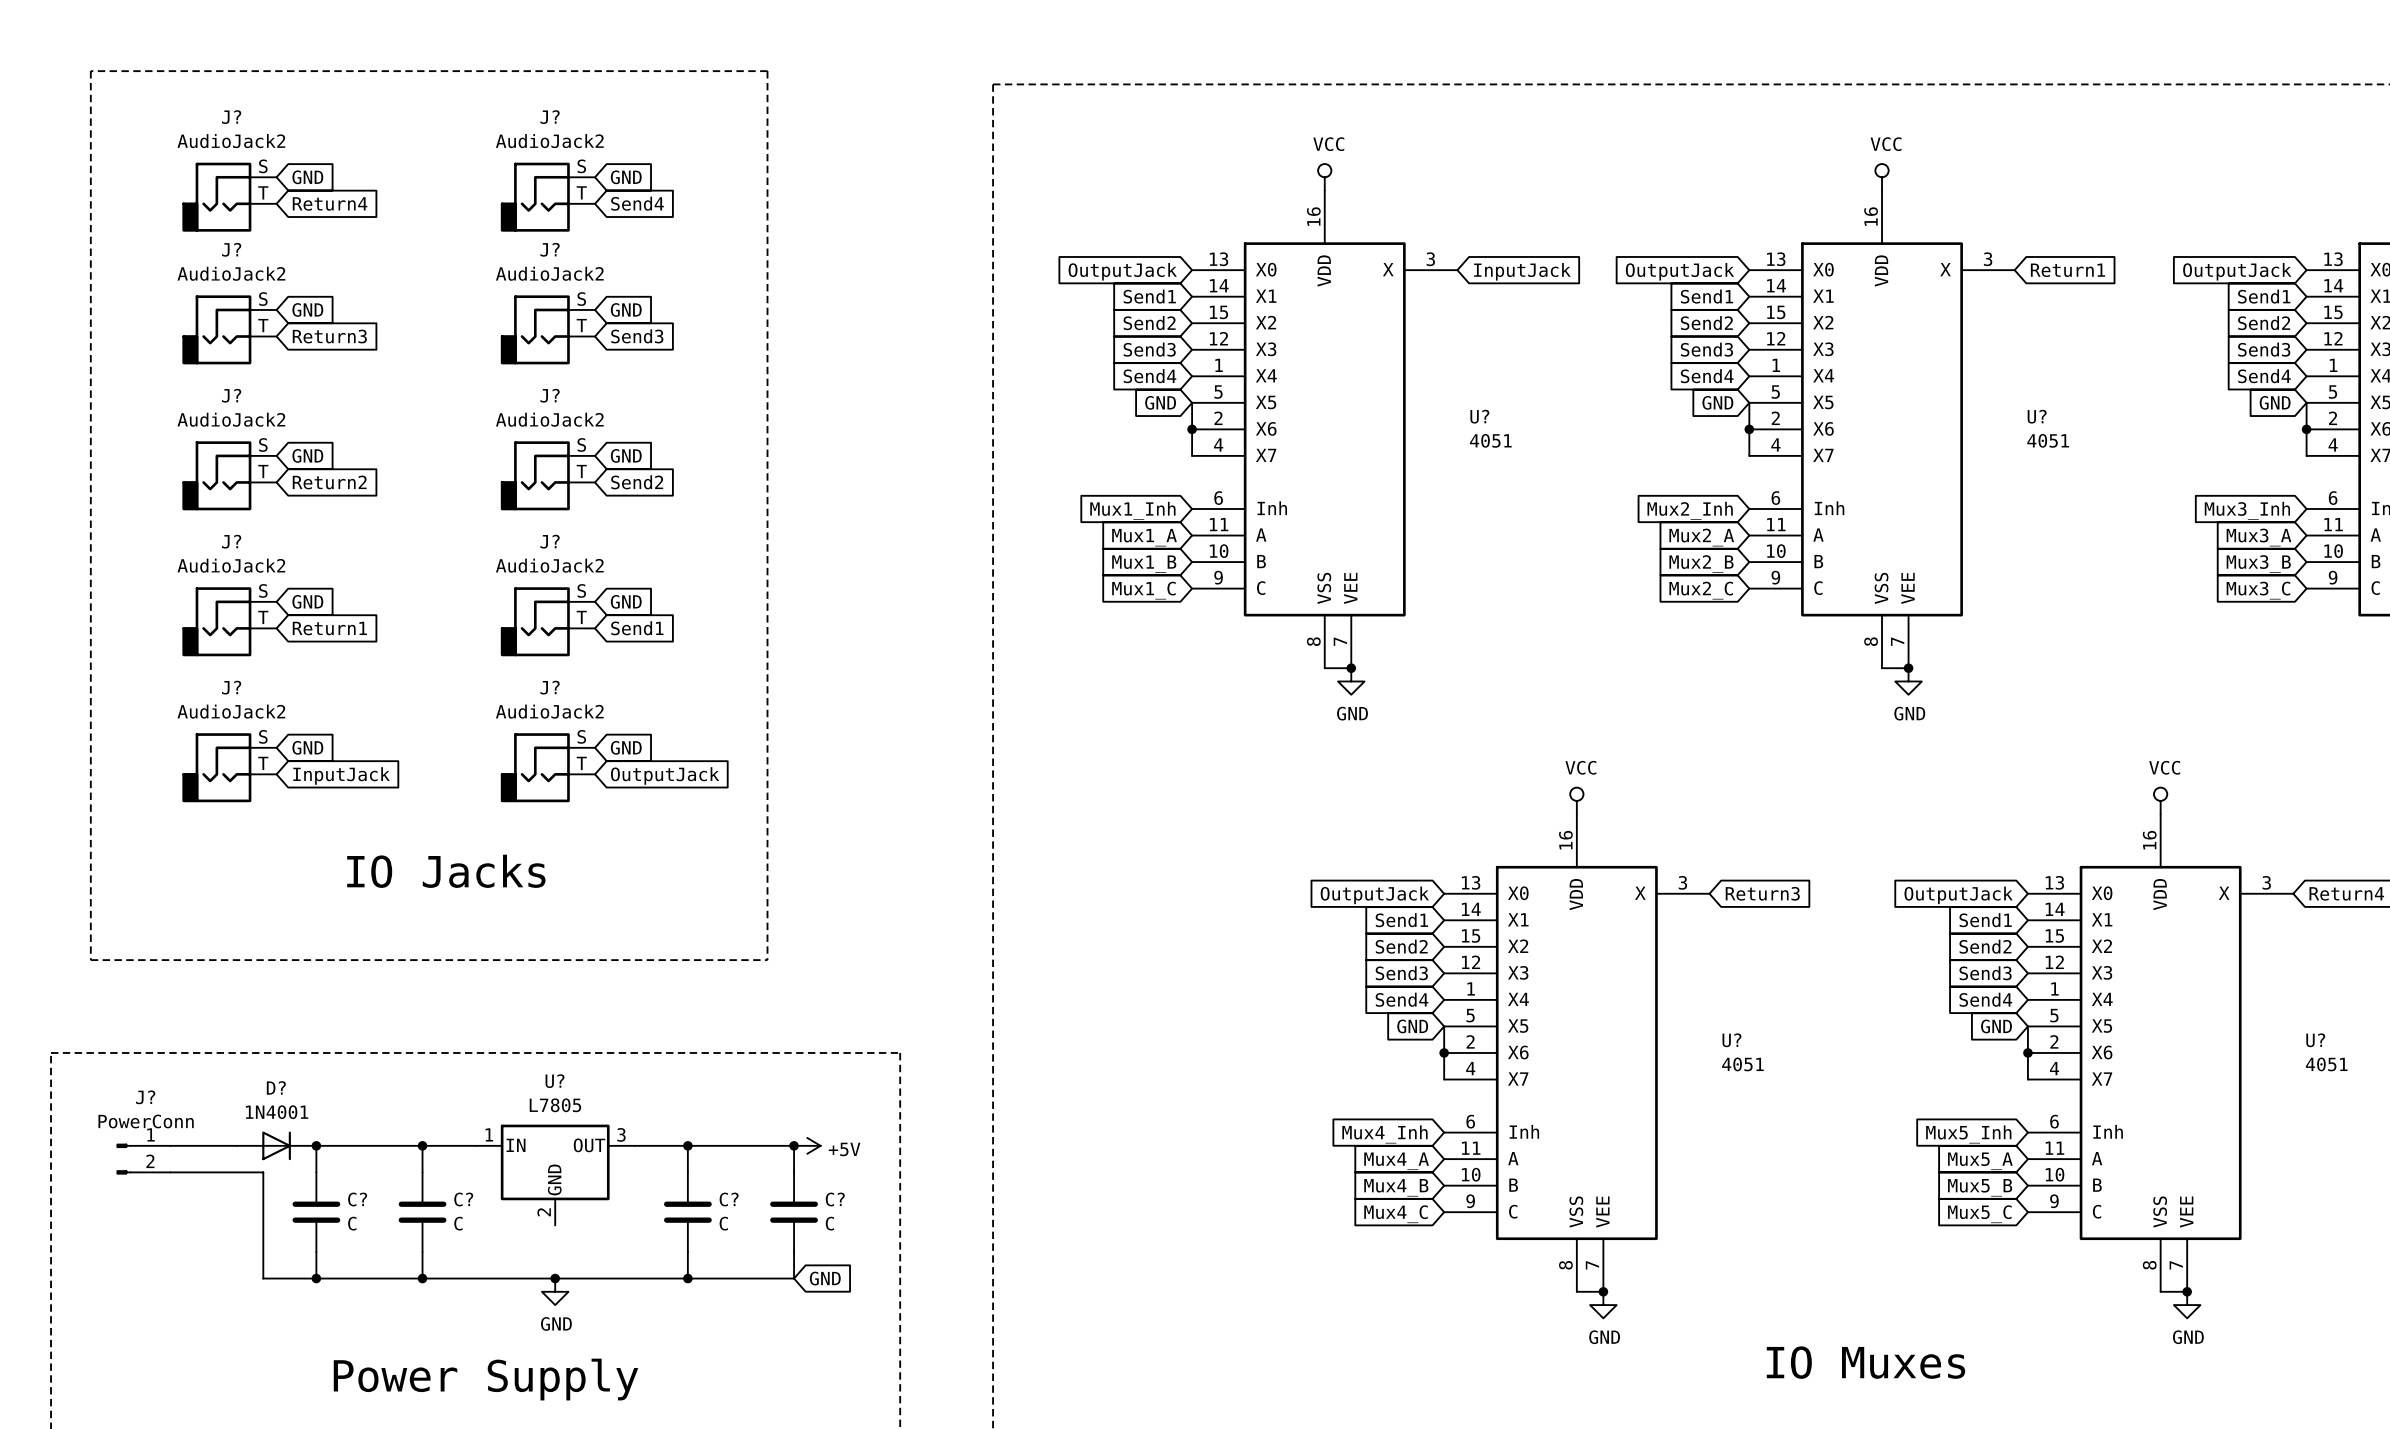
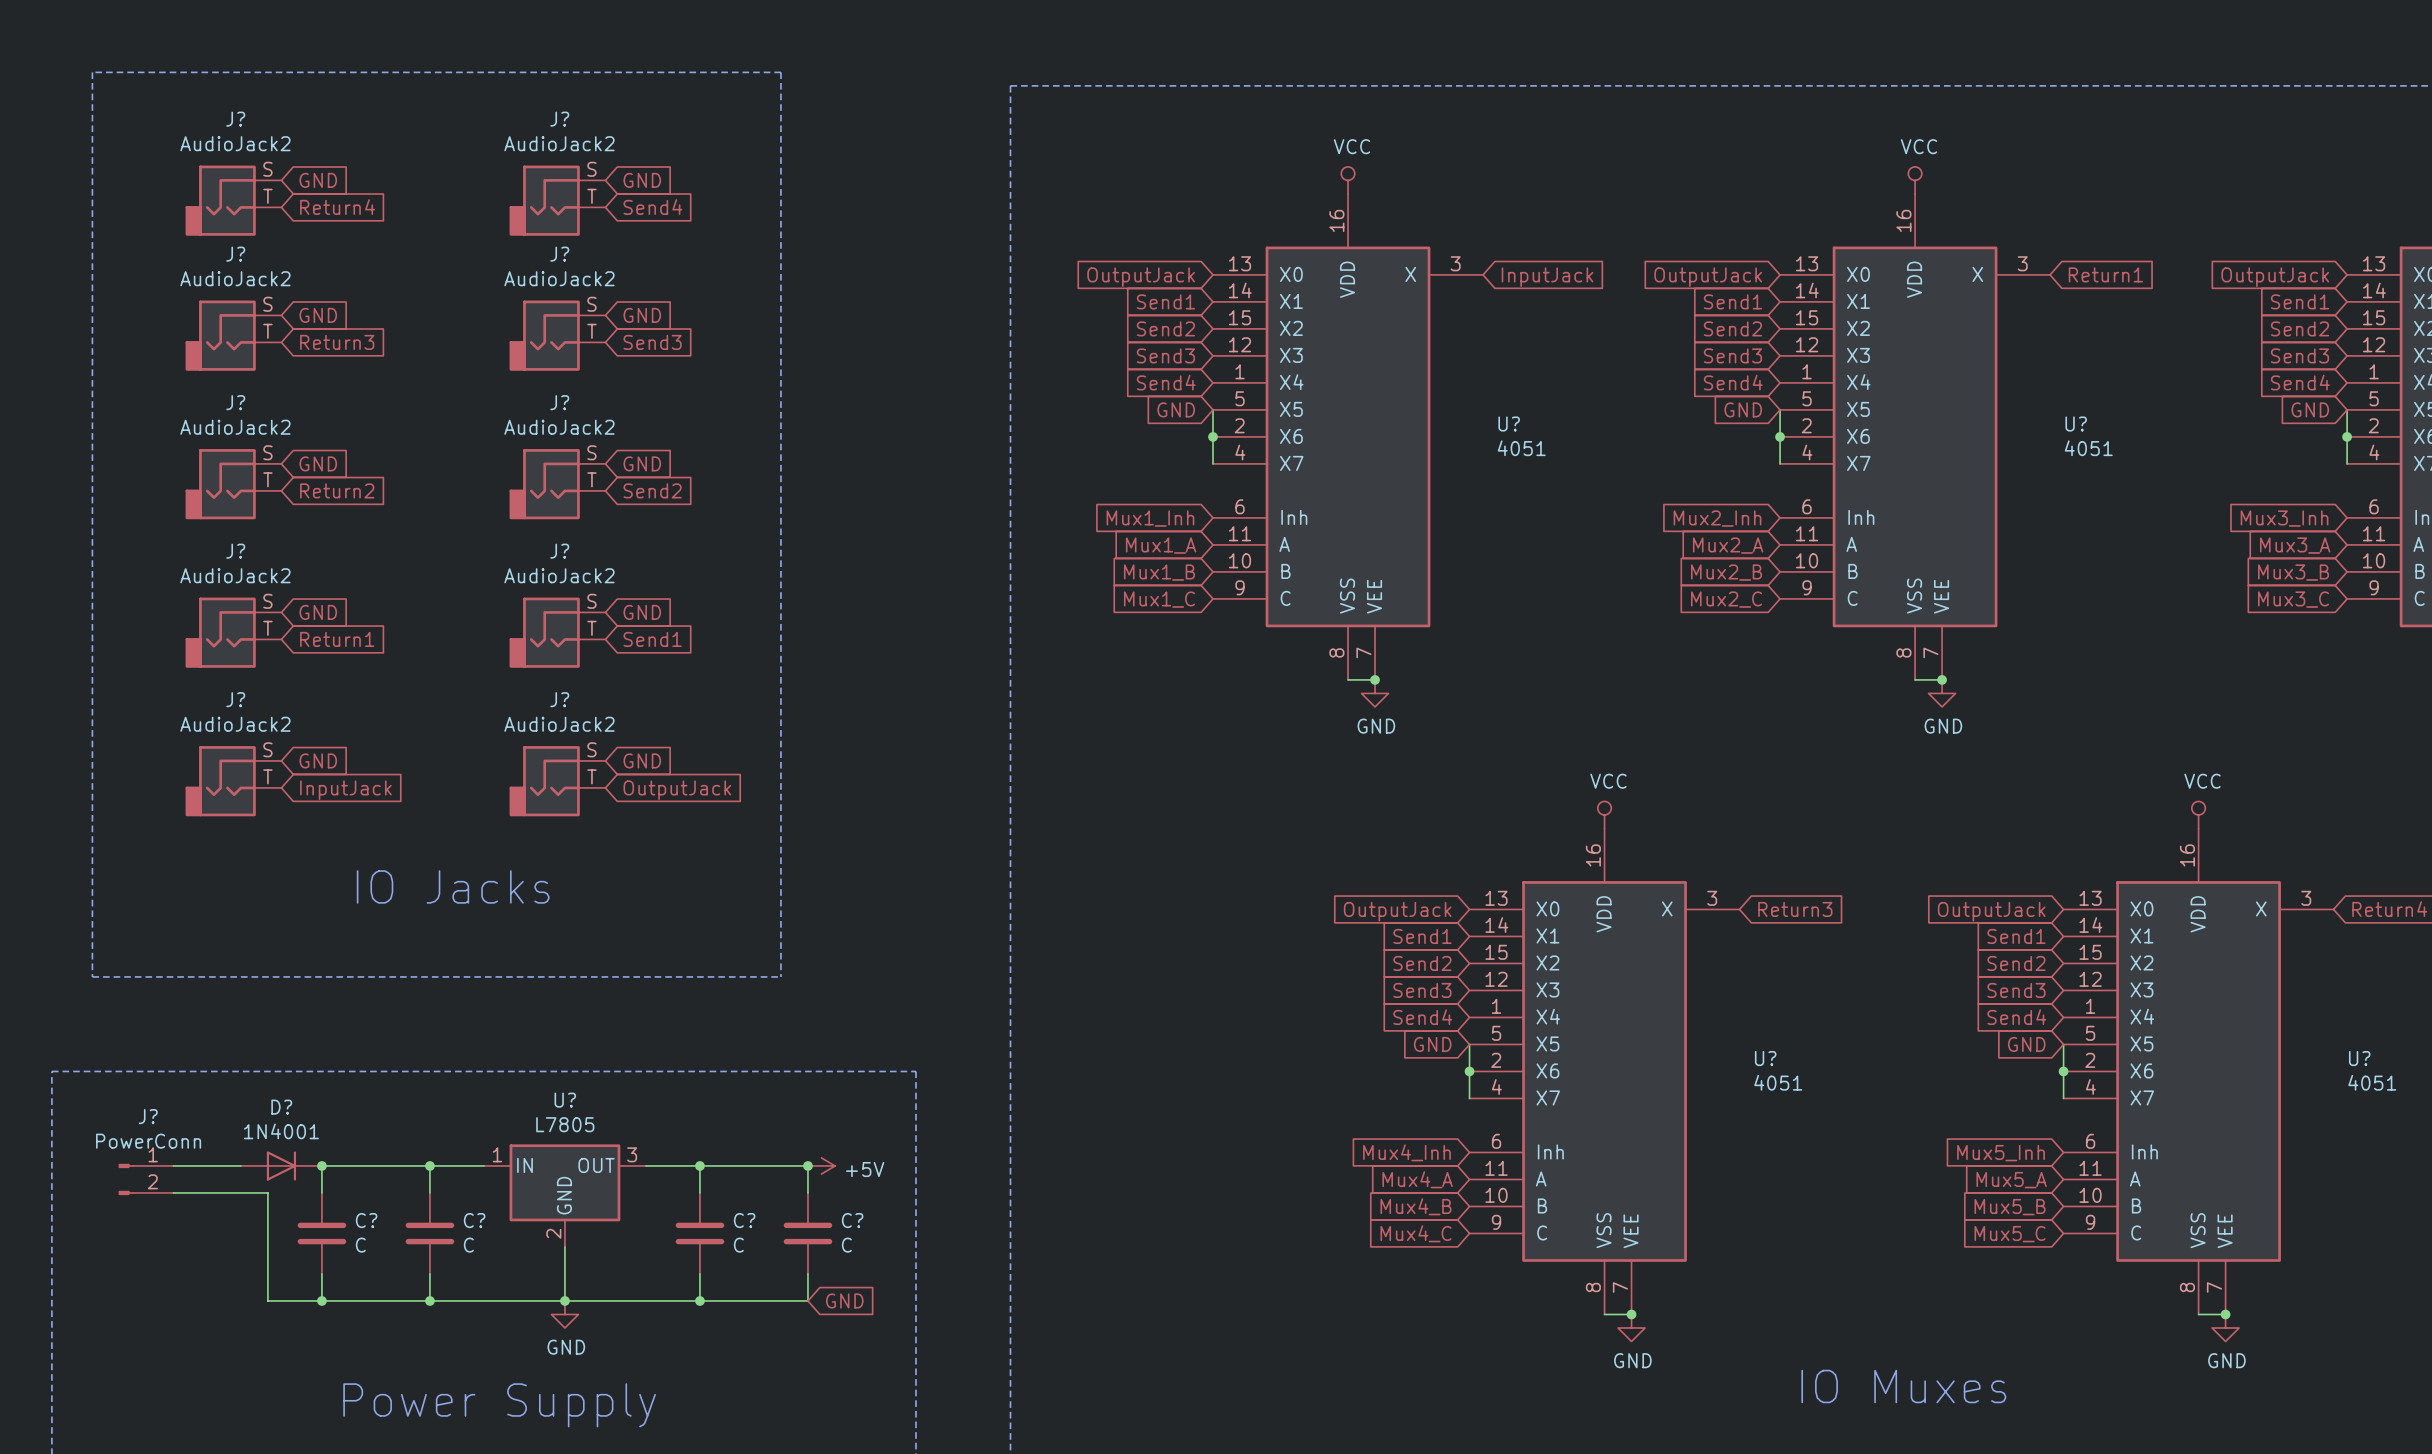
wire: none -> (564, 1246) (564, 1300)

